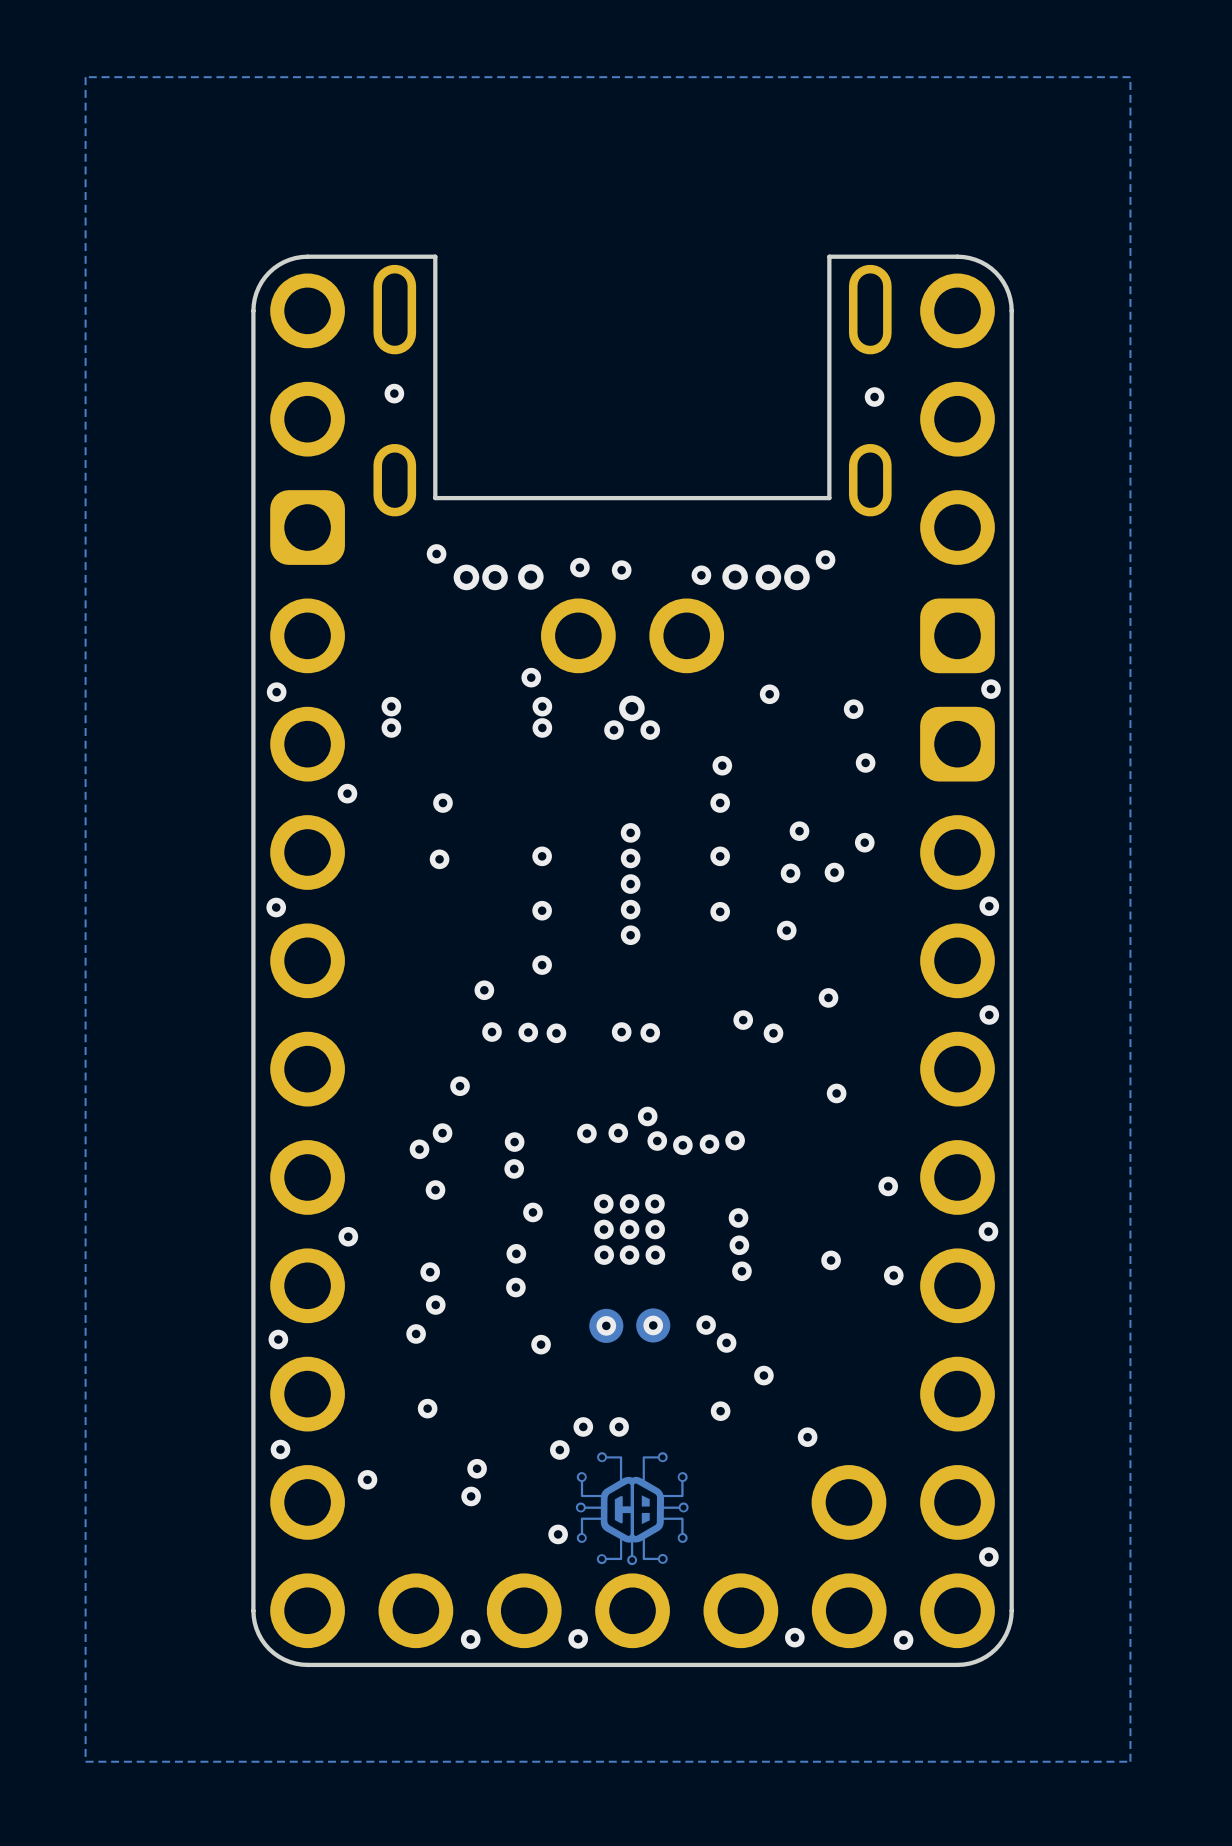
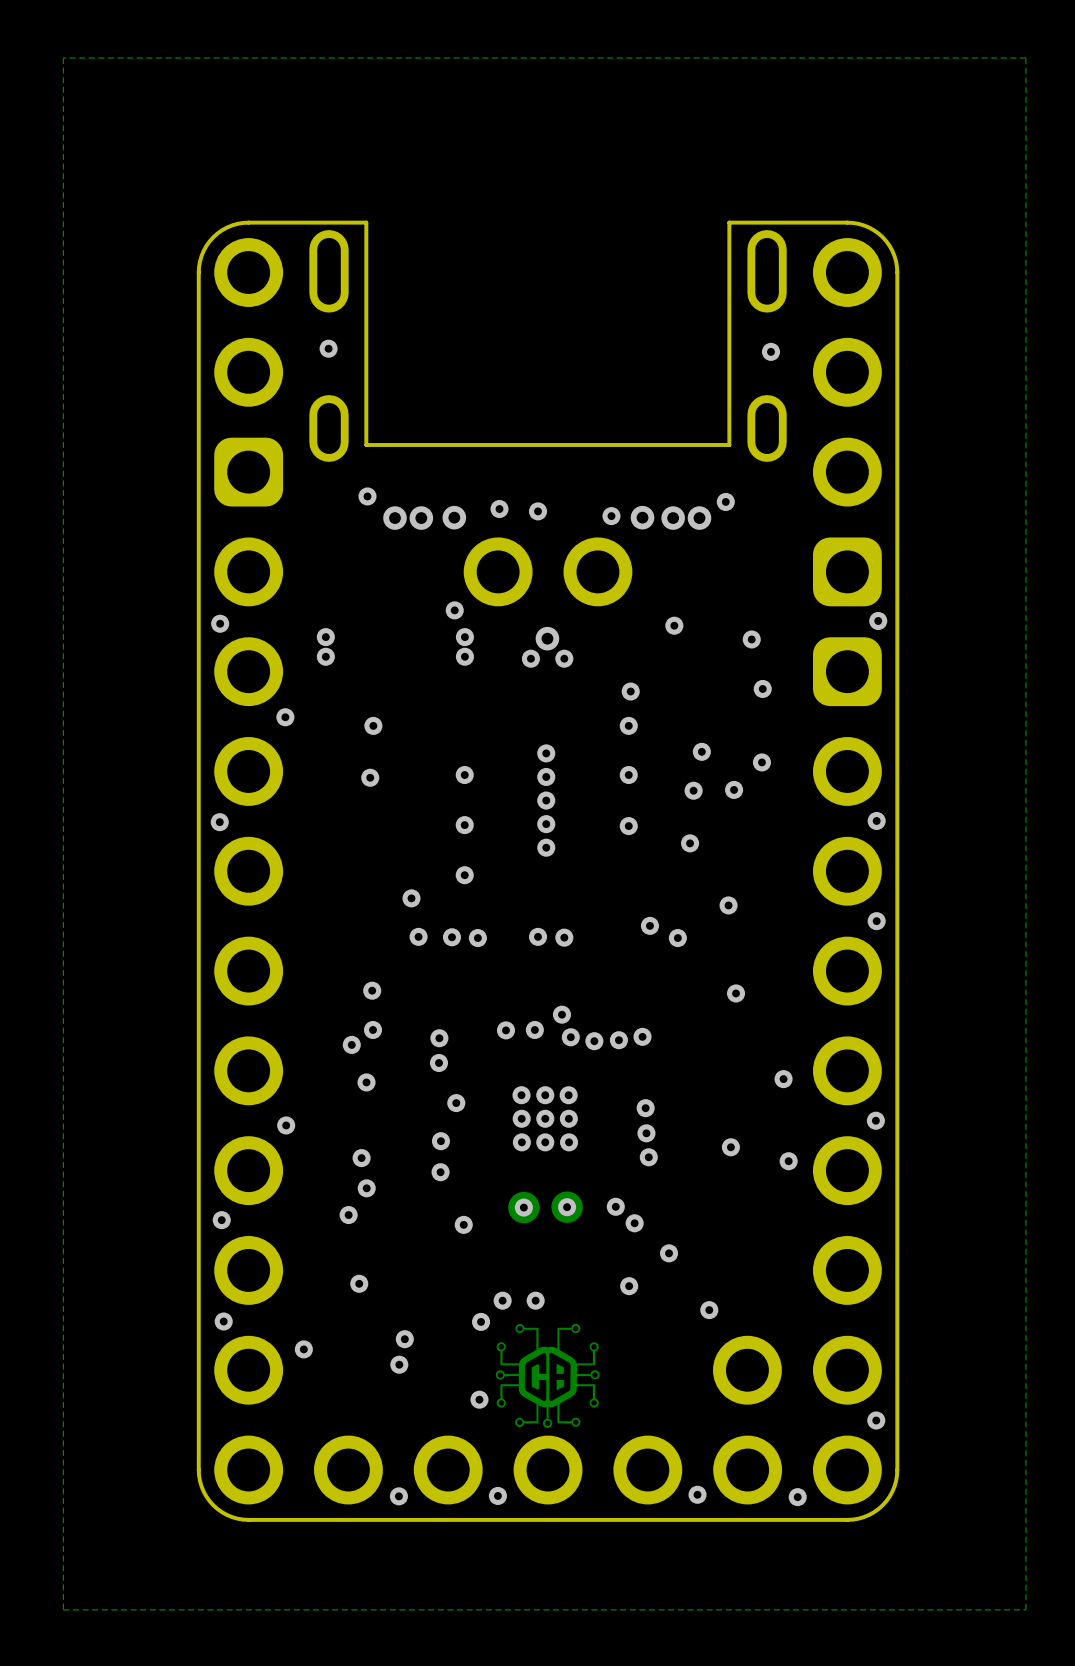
zone outline: (1130, 77) (85, 77) (85, 1761) (1130, 1761) (1130, 77) -> (1025, 57) (63, 57) (63, 1609) (1025, 1609) (1025, 57)
via position: (460, 1086) -> (372, 990)

